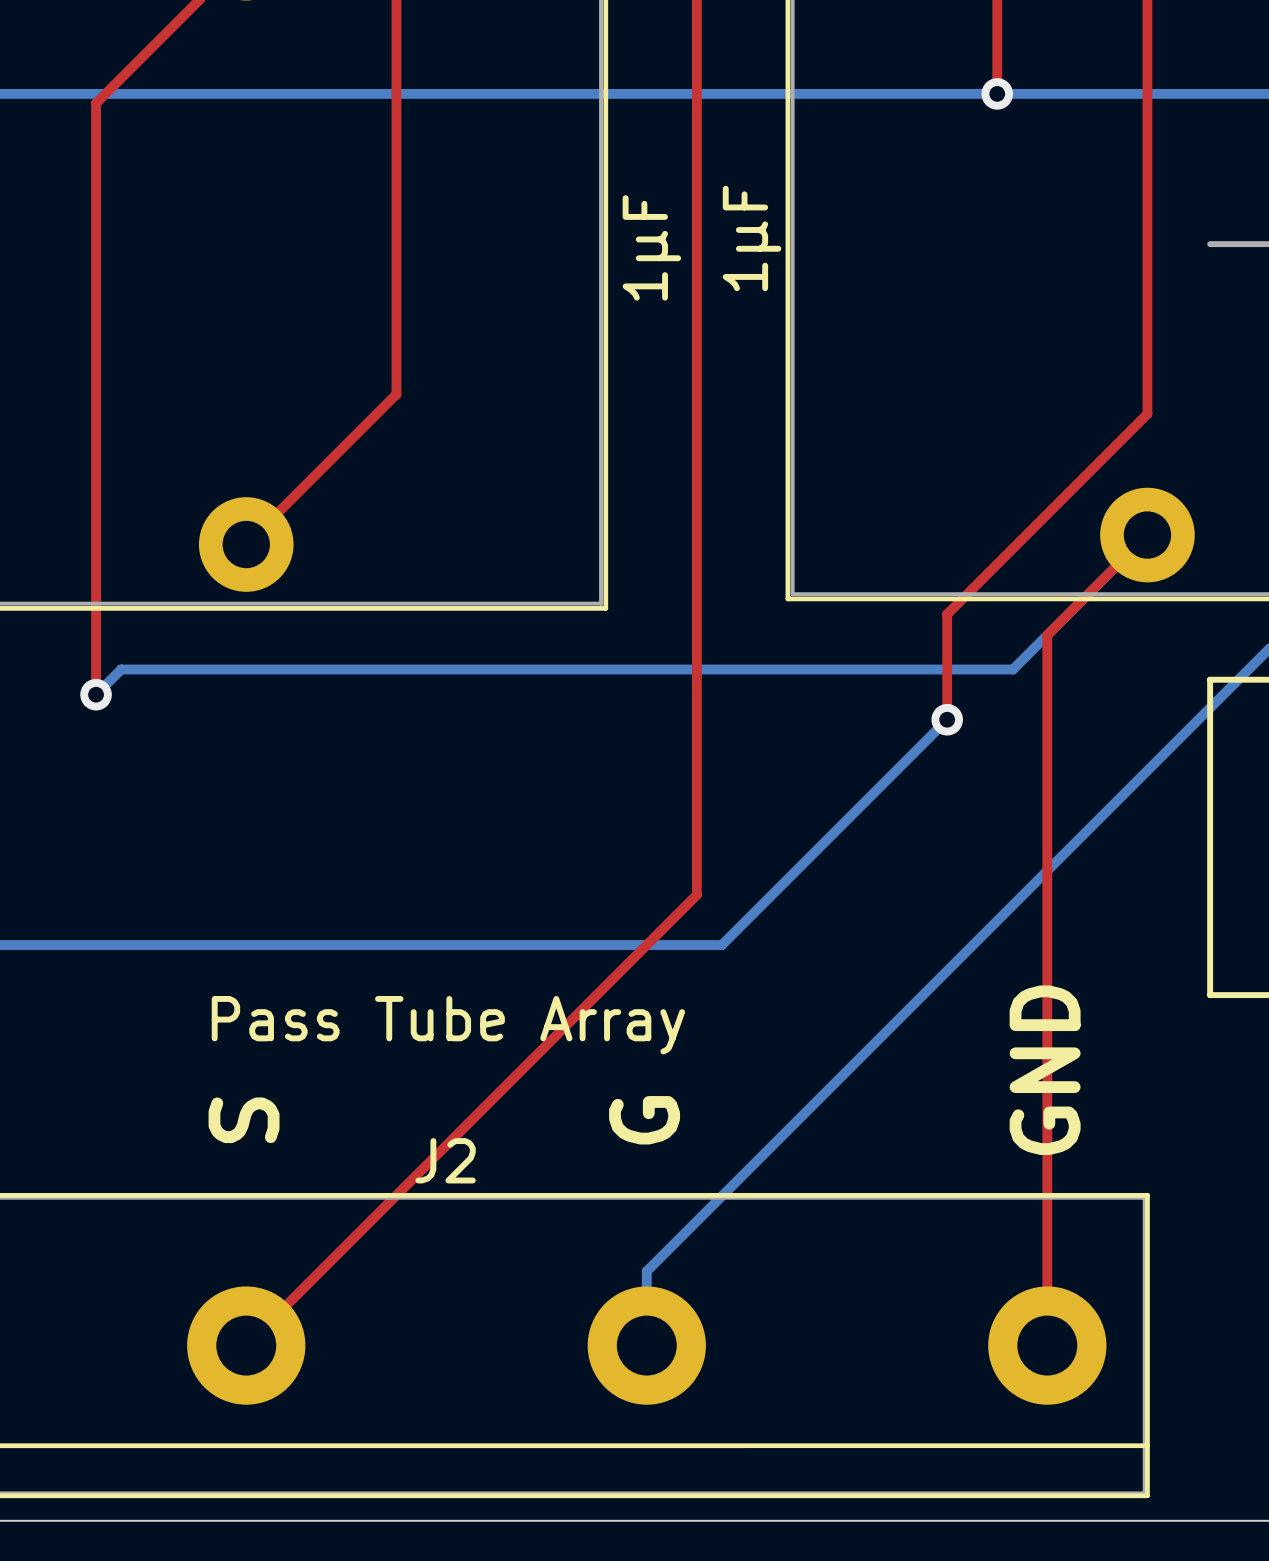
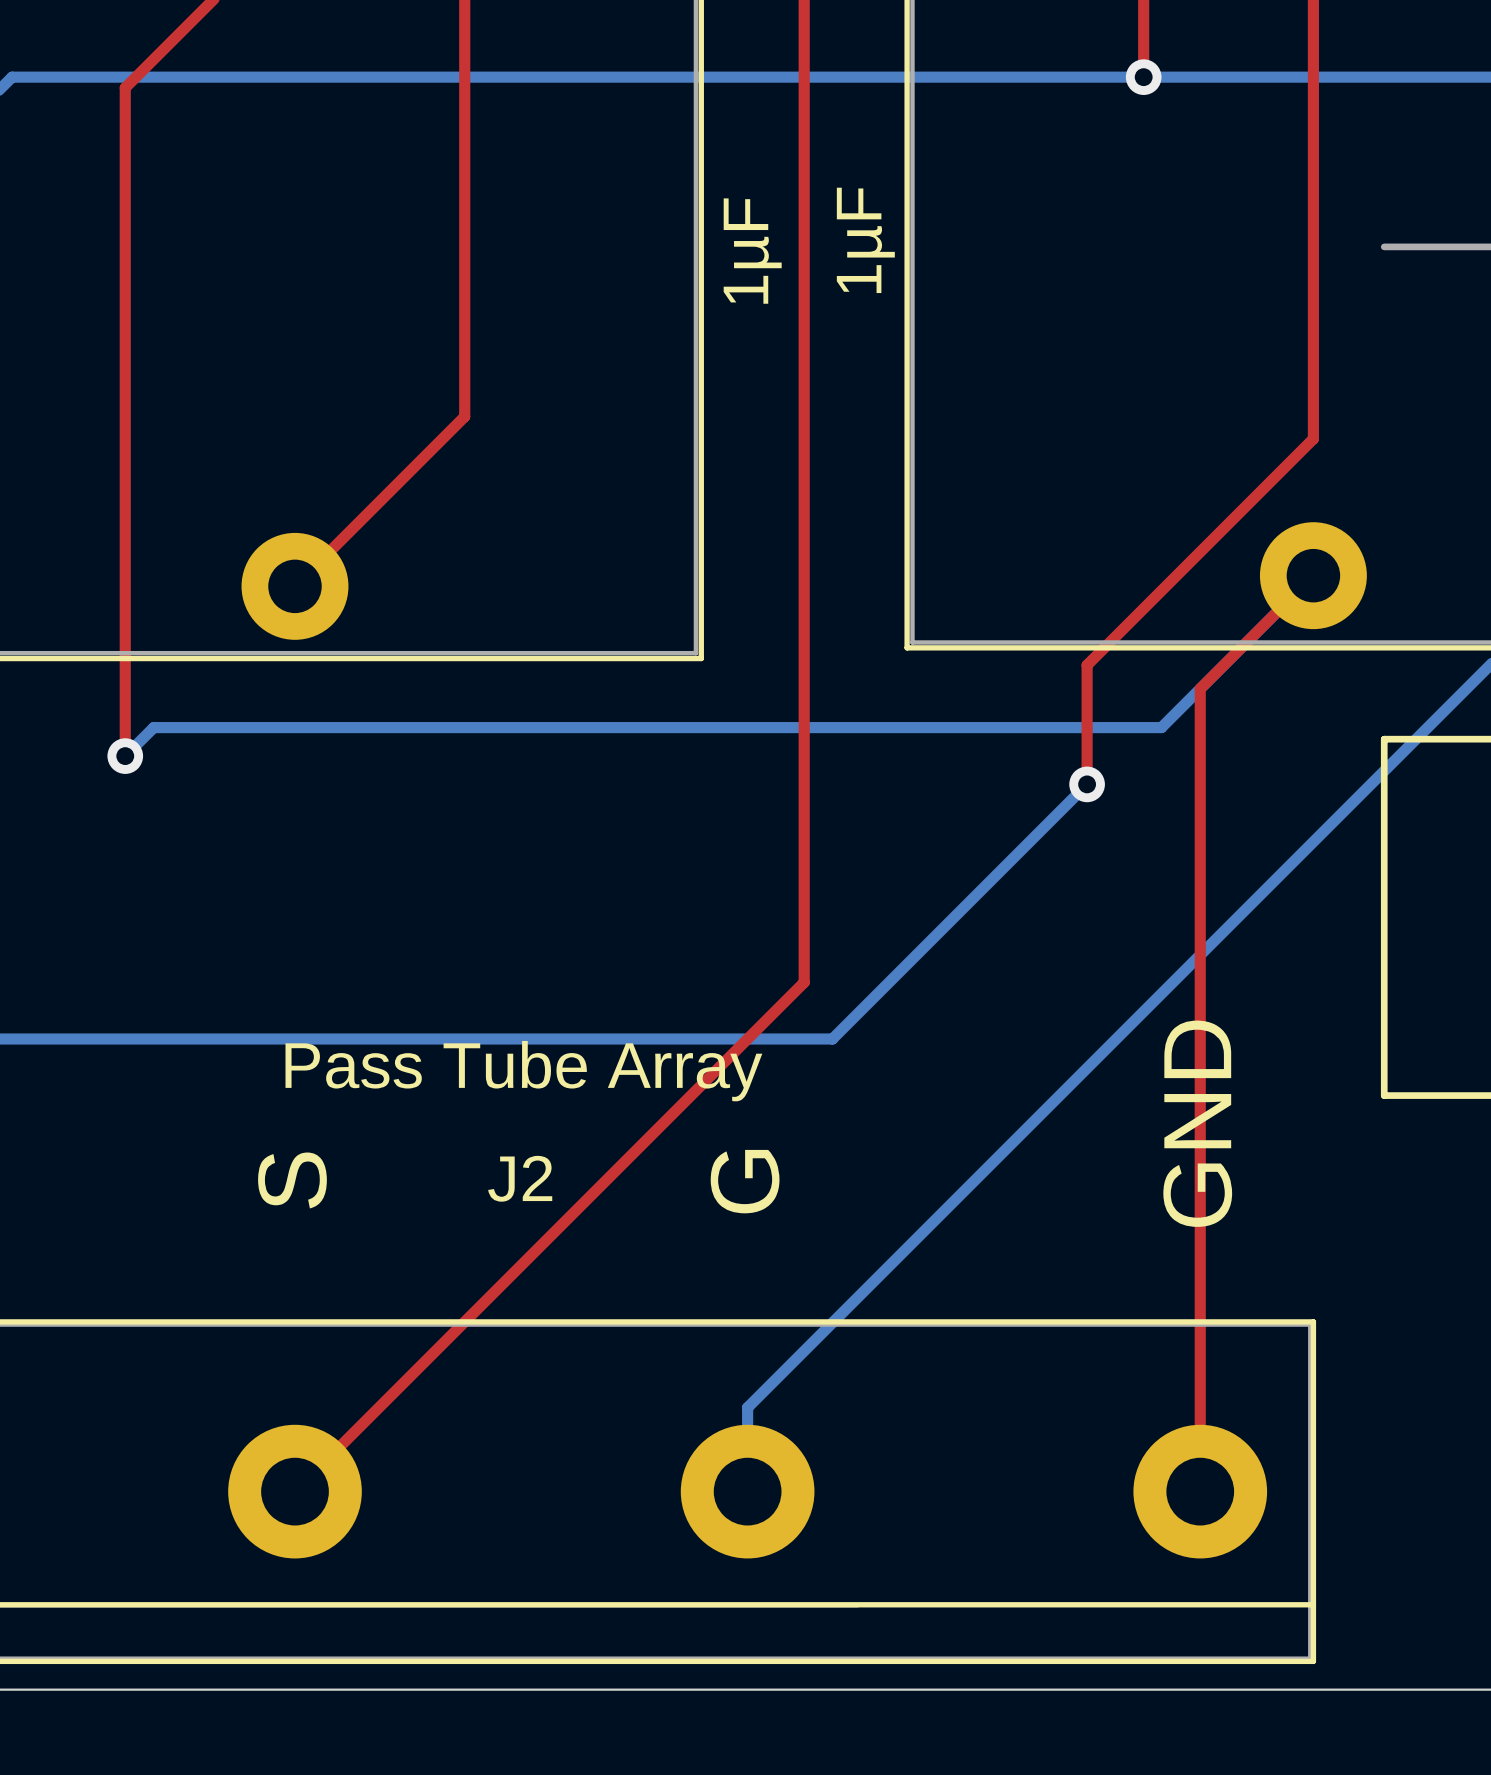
J2 value position: Pass Tube Array (448, 1025) -> Pass Tube Array (523, 1071)
text position: GND (1045, 1070) -> GND (1197, 1123)
text position: S (244, 1120) -> S (292, 1180)
text position: G (644, 1120) -> G (745, 1181)
J2 name position: J2 (445, 1160) -> J2 (520, 1178)

